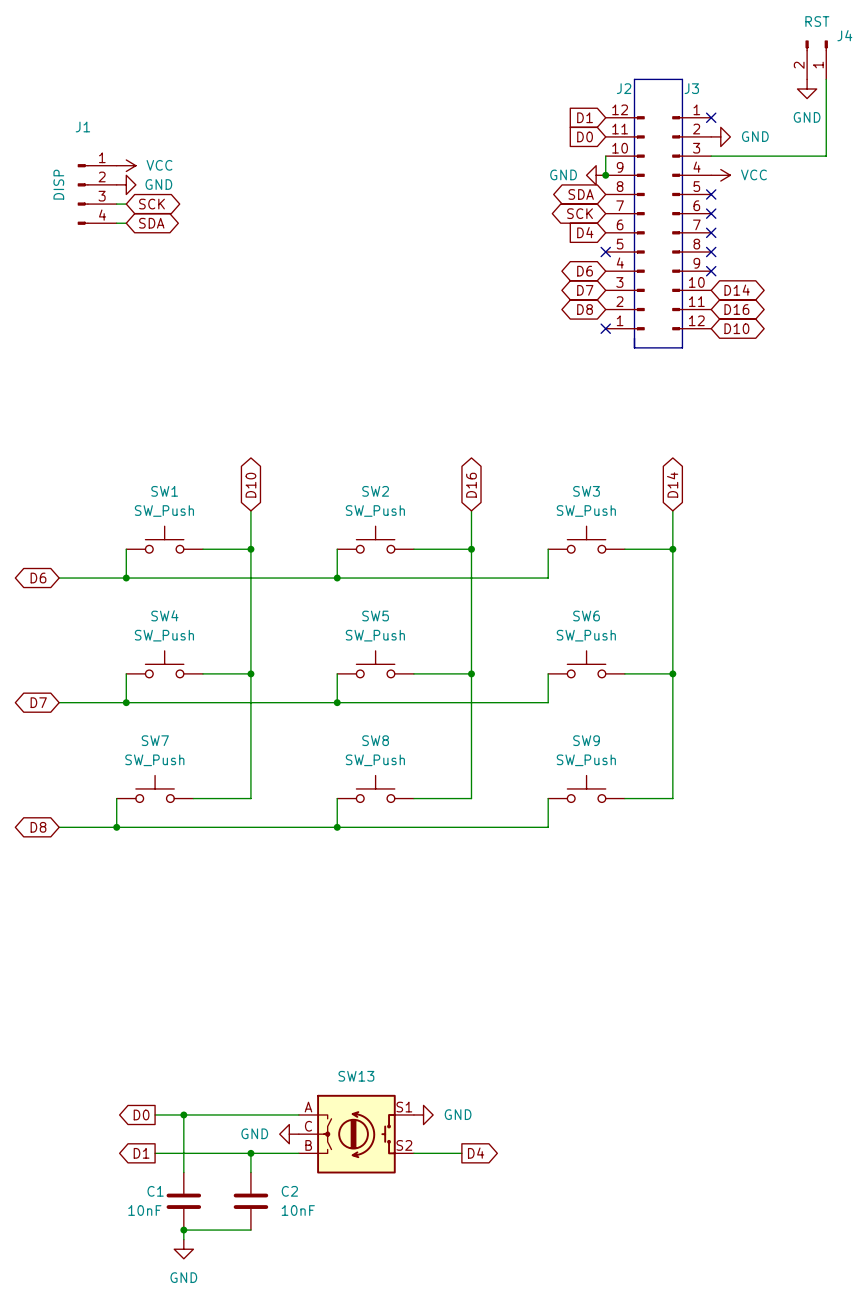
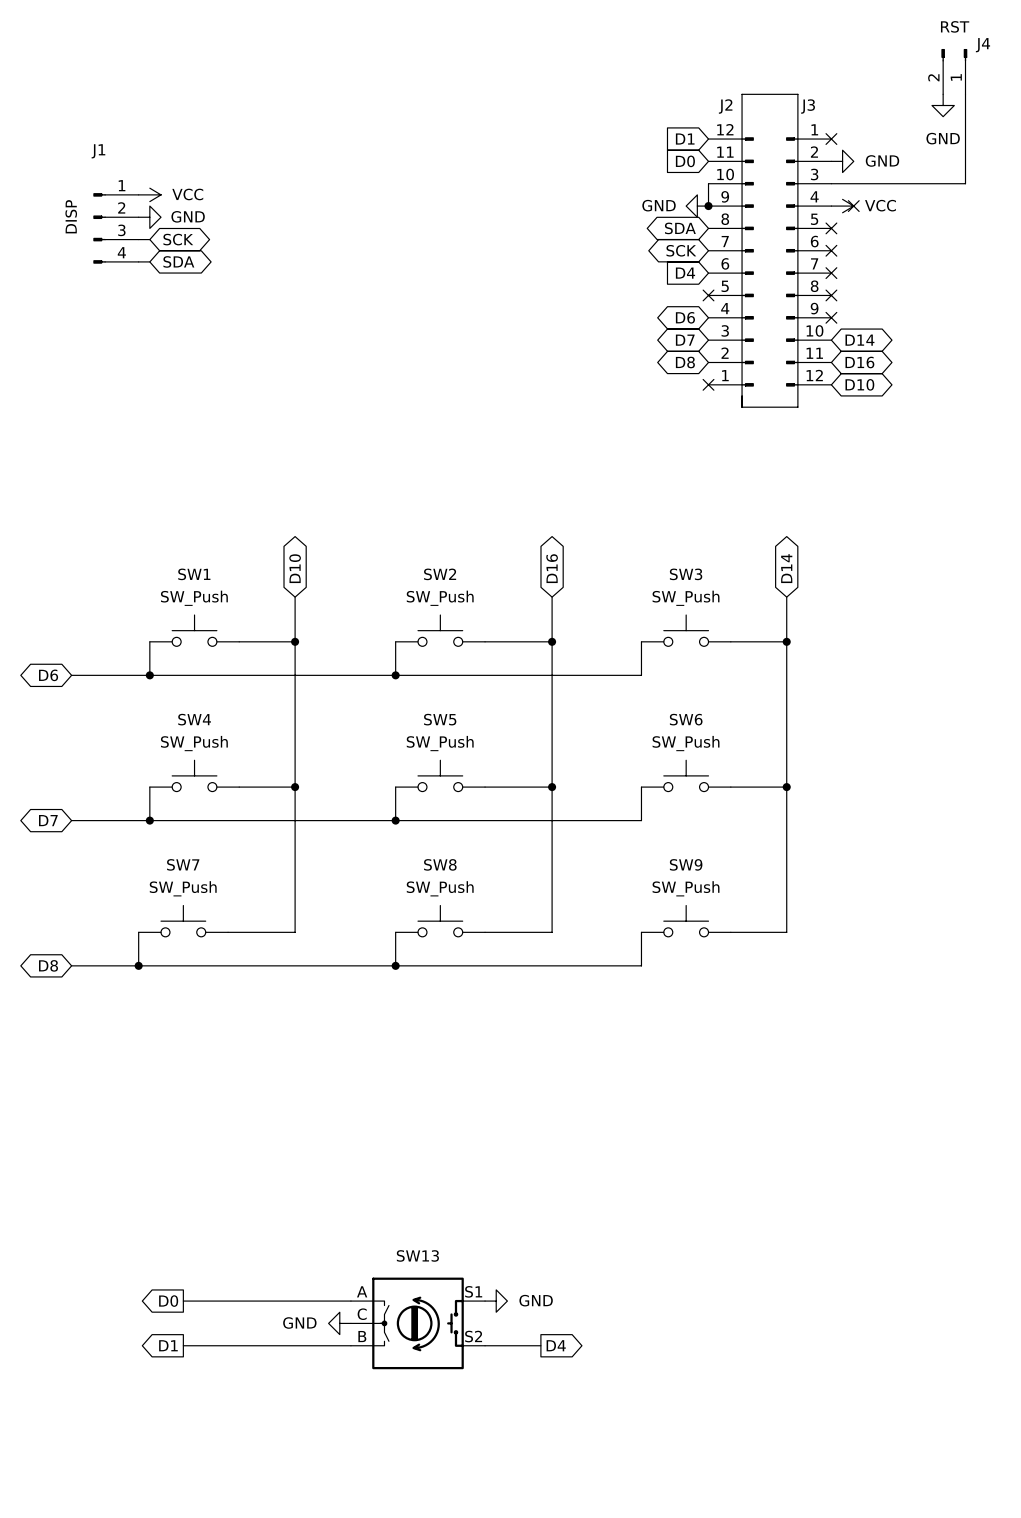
no-connect mark: none -> (853, 206)
wire: (183, 1114) (183, 1172) -> none
junction: (183, 1114) -> none
wire: (250, 1153) (250, 1172) -> none
junction: (250, 1153) -> none
C1: 10nF (183, 1201) -> none
C2: 10nF (250, 1201) -> none
junction: (183, 1230) -> none
wire: (250, 1230) (183, 1230) (183, 1239) -> none
power symbol: GND (183, 1249) -> none

